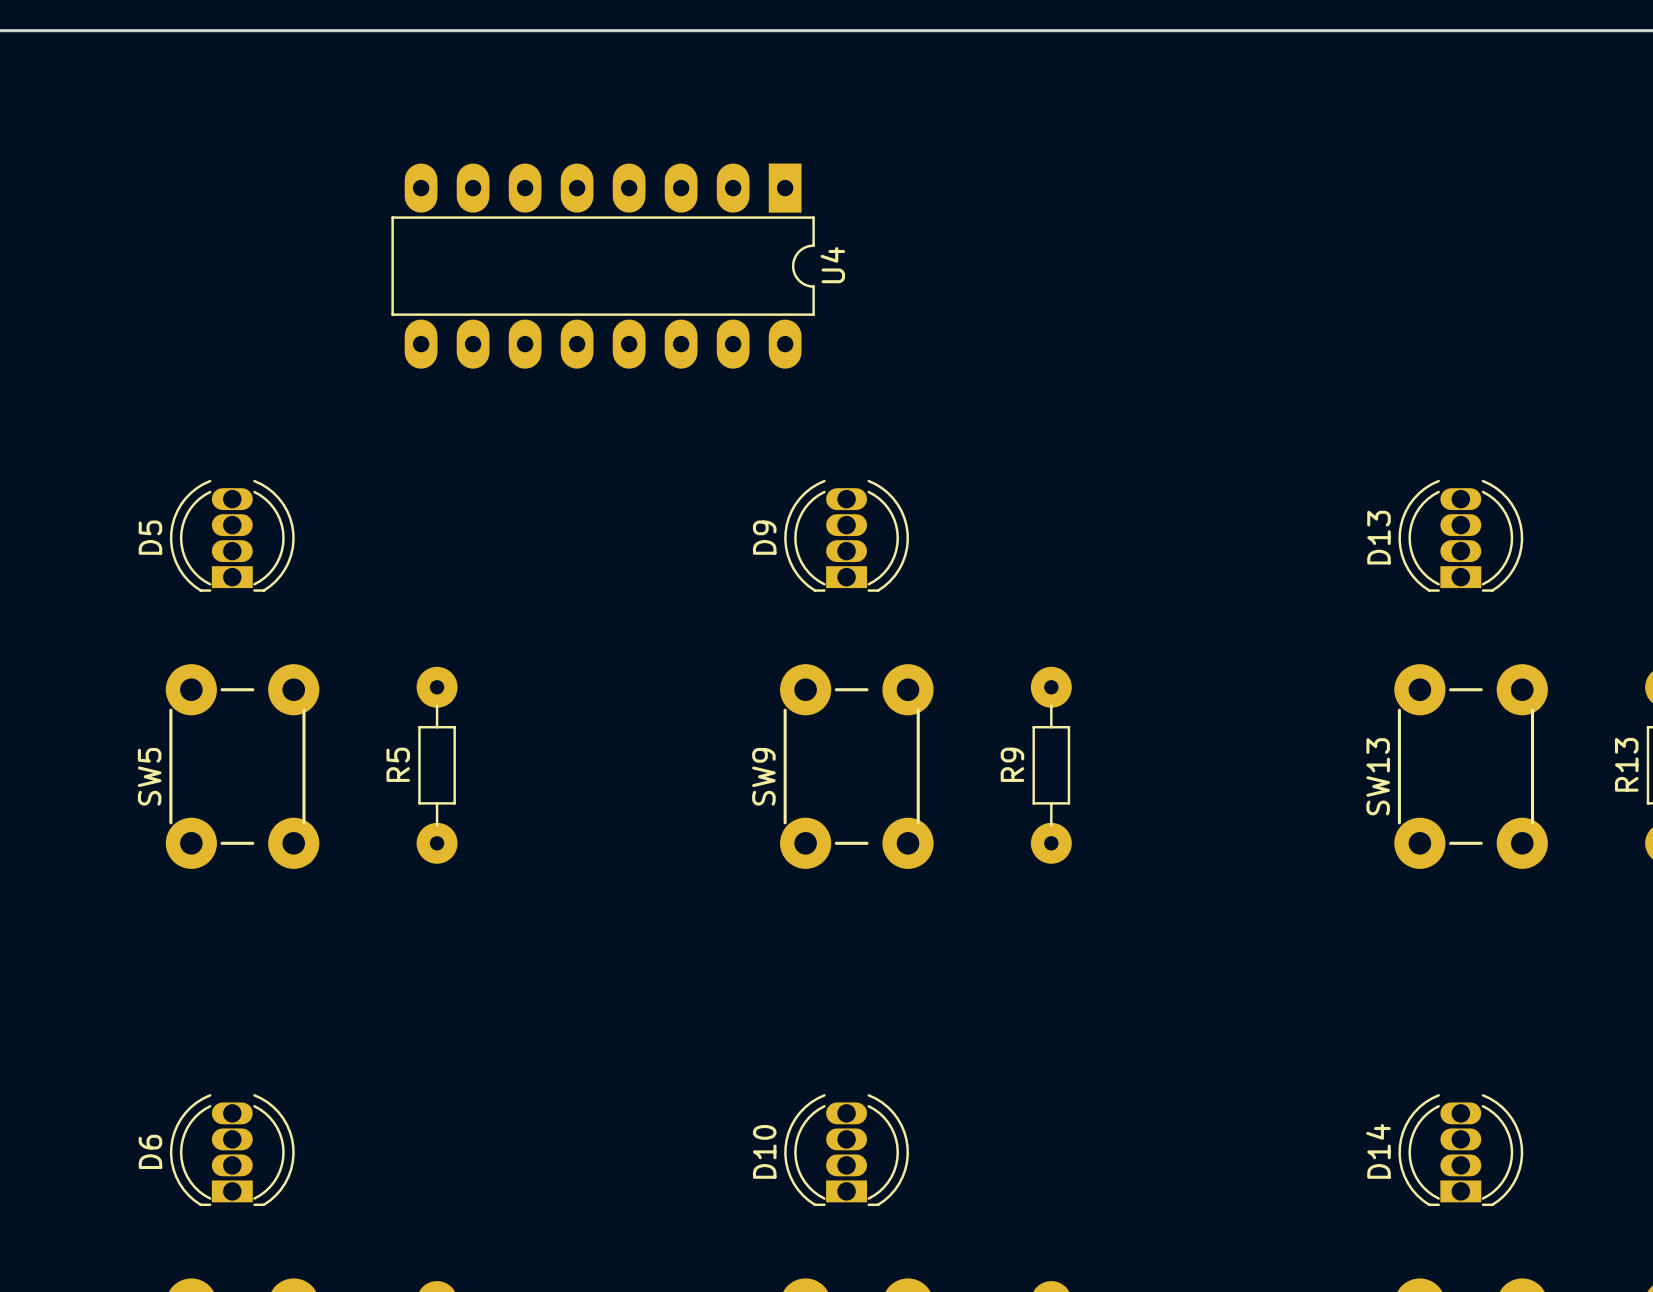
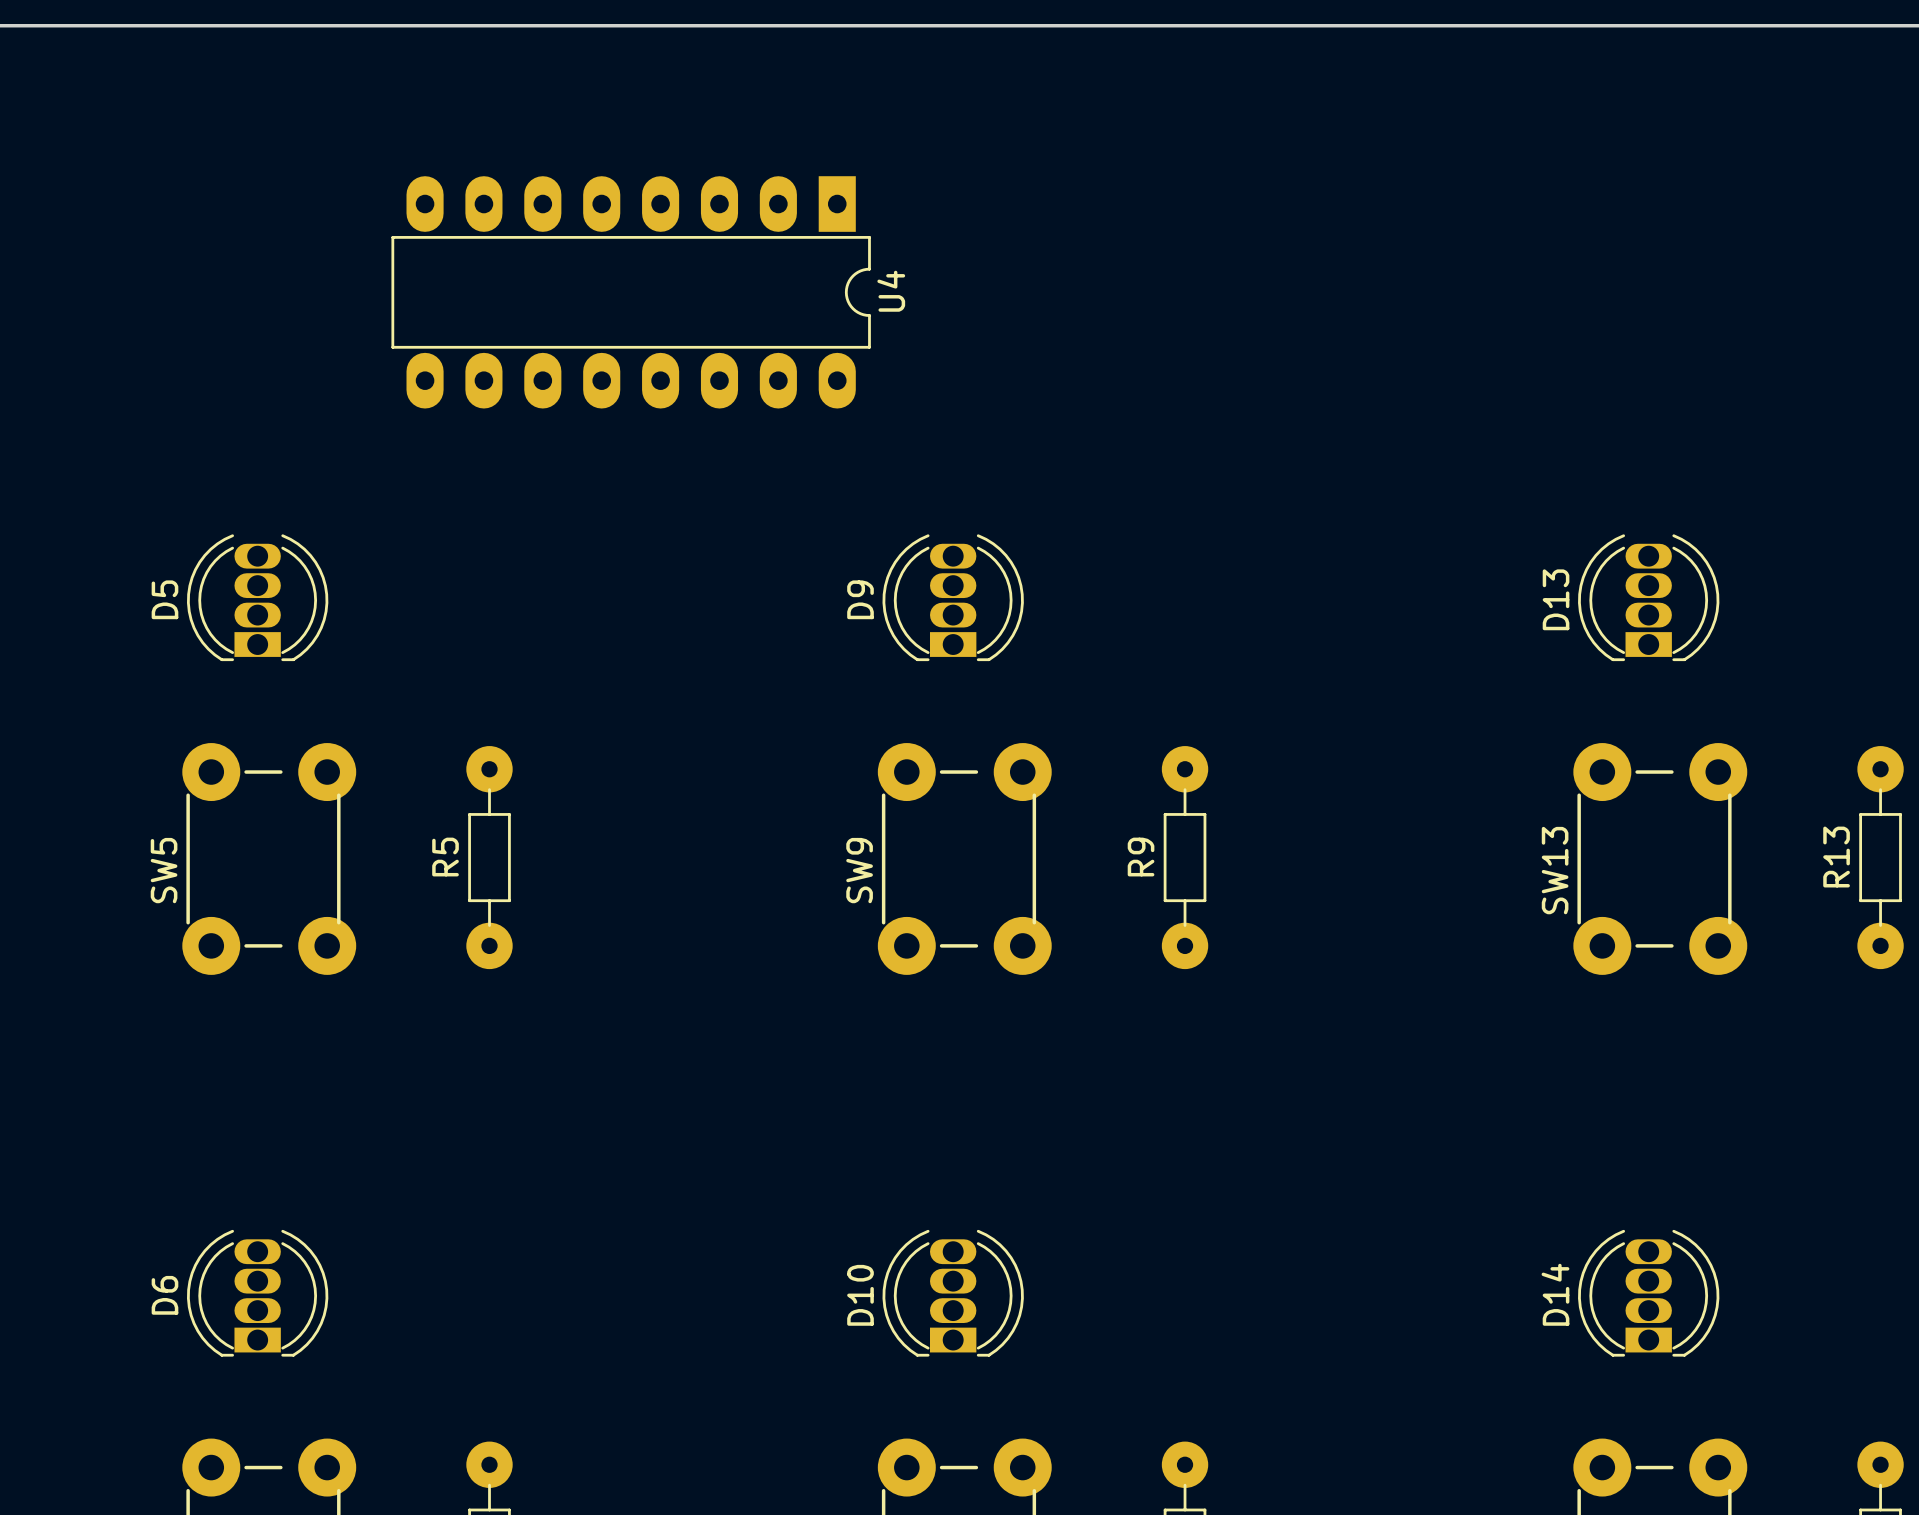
U4 position: (603, 266) -> (631, 292)

